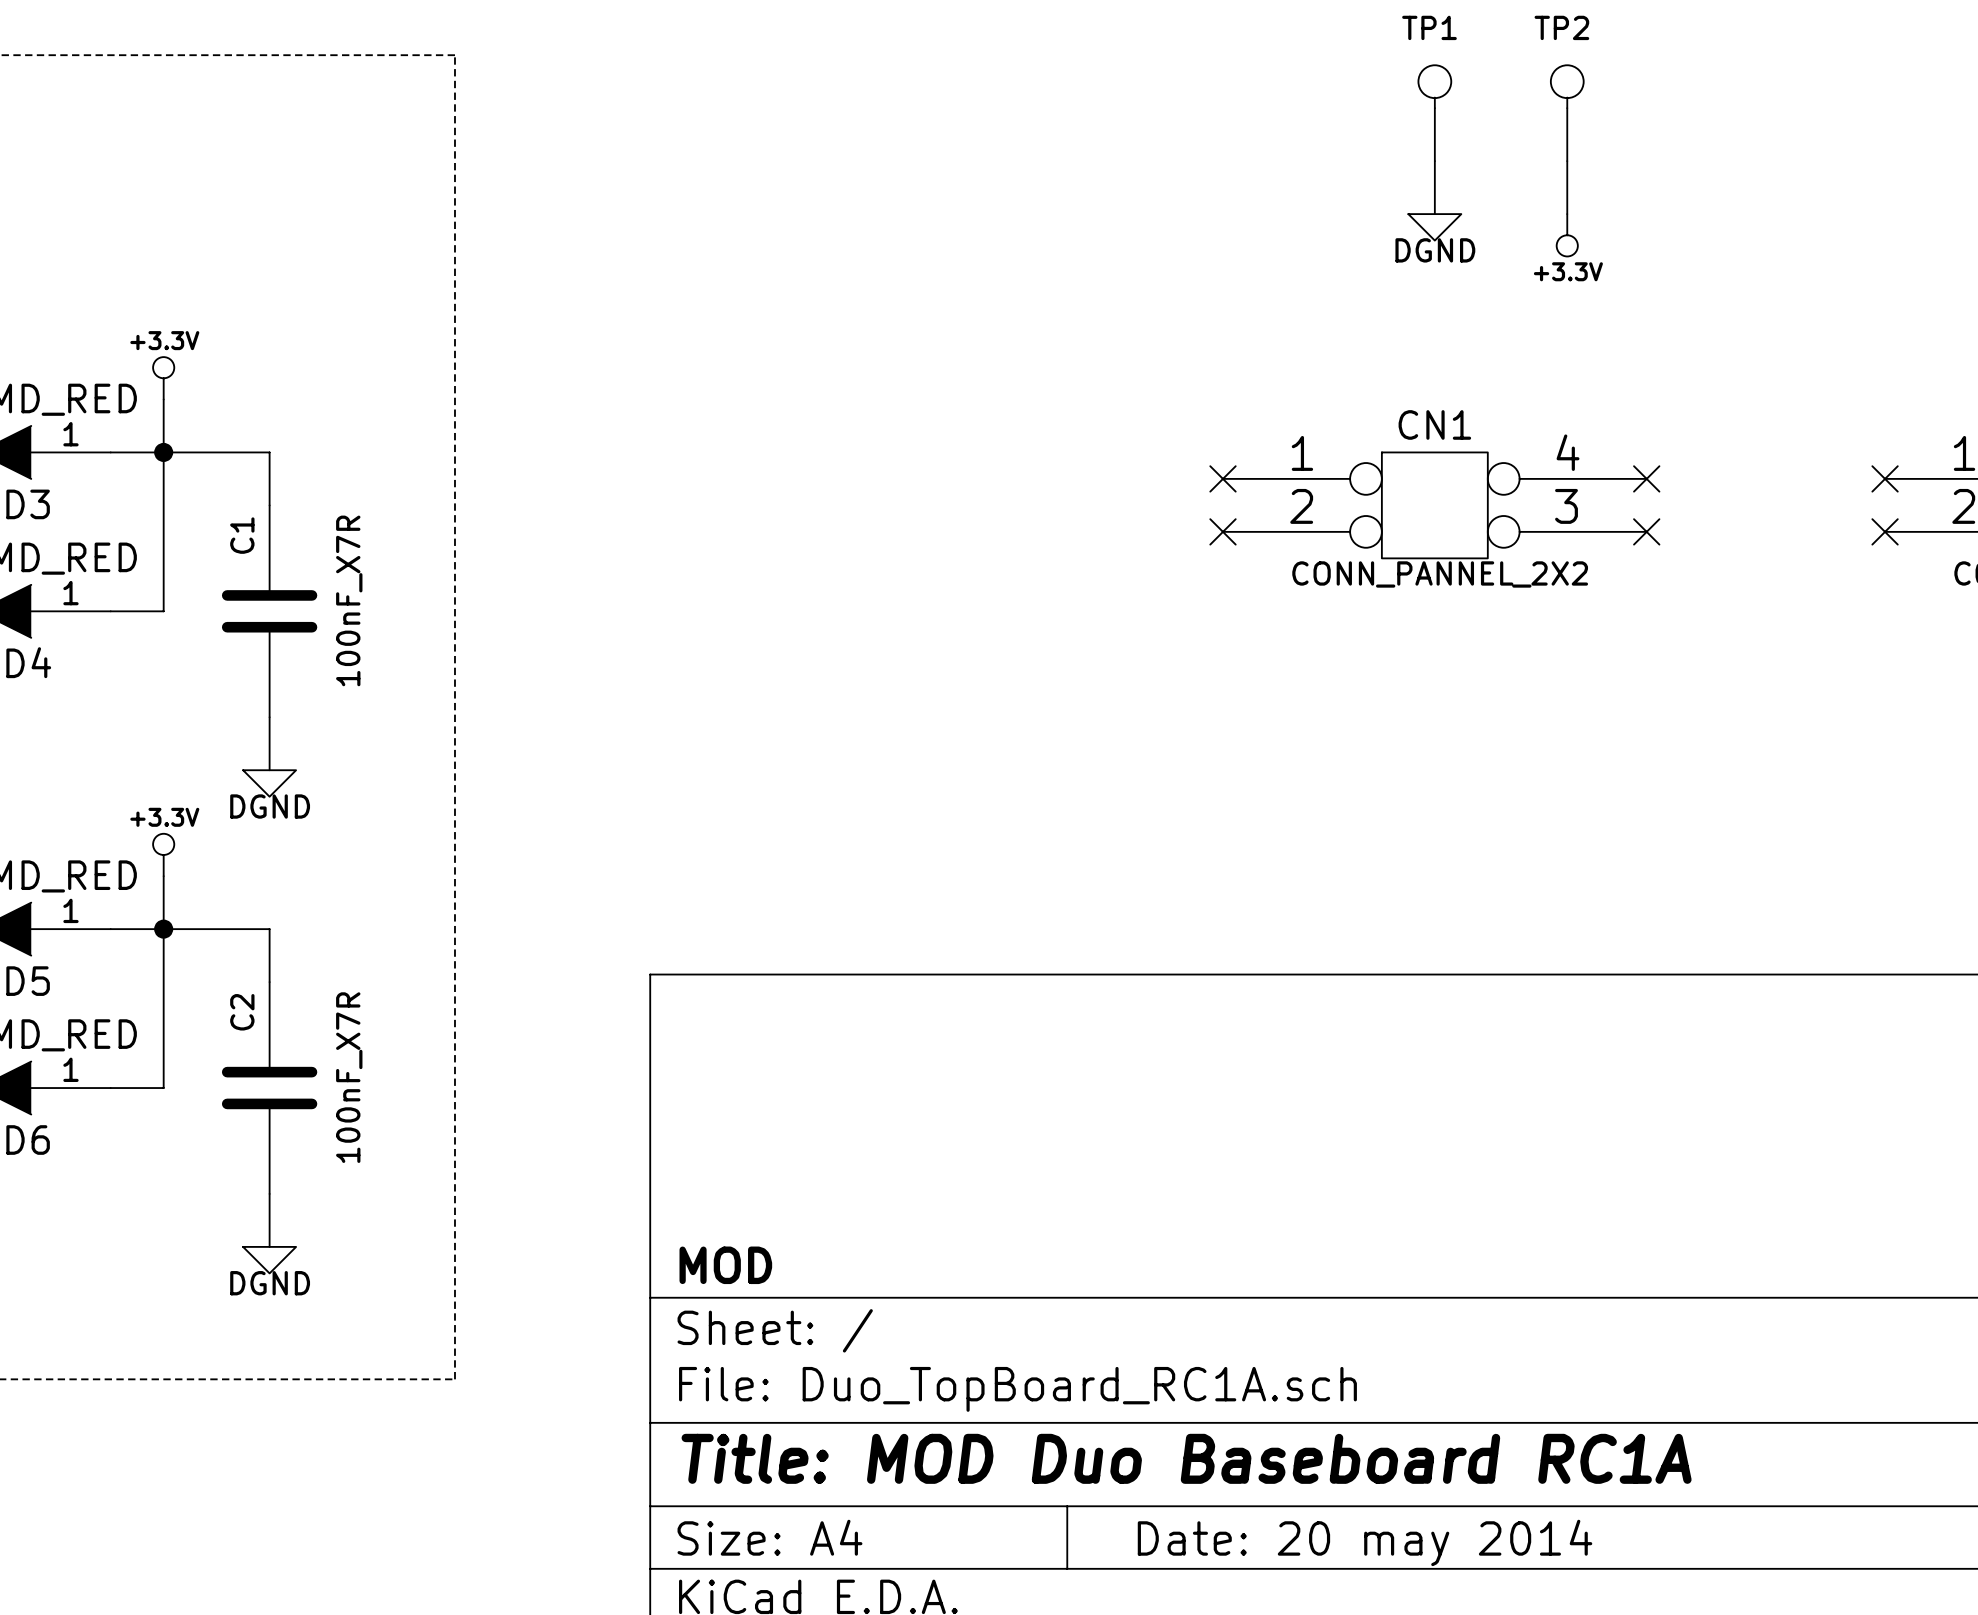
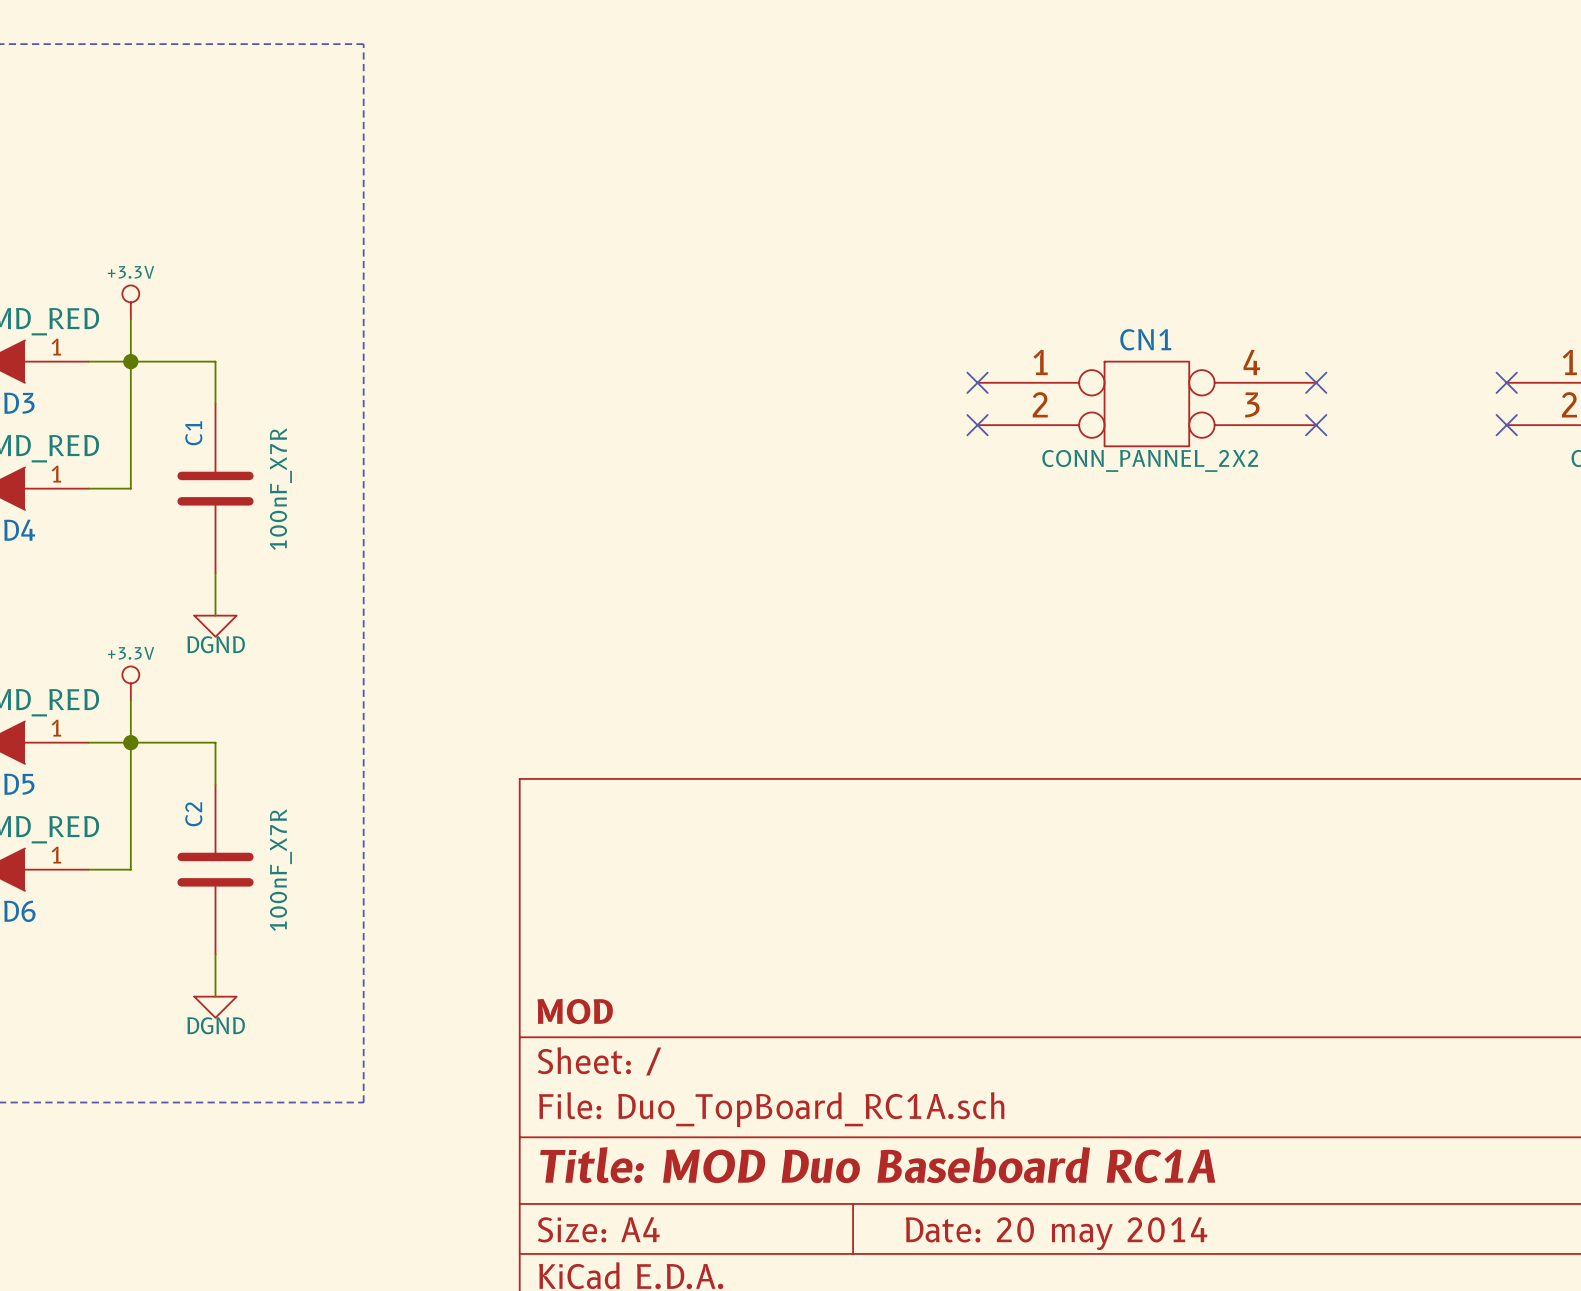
TP1: (1434, 113) -> none
TP2: (1567, 113) -> none
wire: (1434, 161) (1434, 214) -> none
wire: (1567, 161) (1567, 214) -> none
power symbol: DGND (1434, 227) -> none
power symbol: +3.3V (1567, 235) -> none

